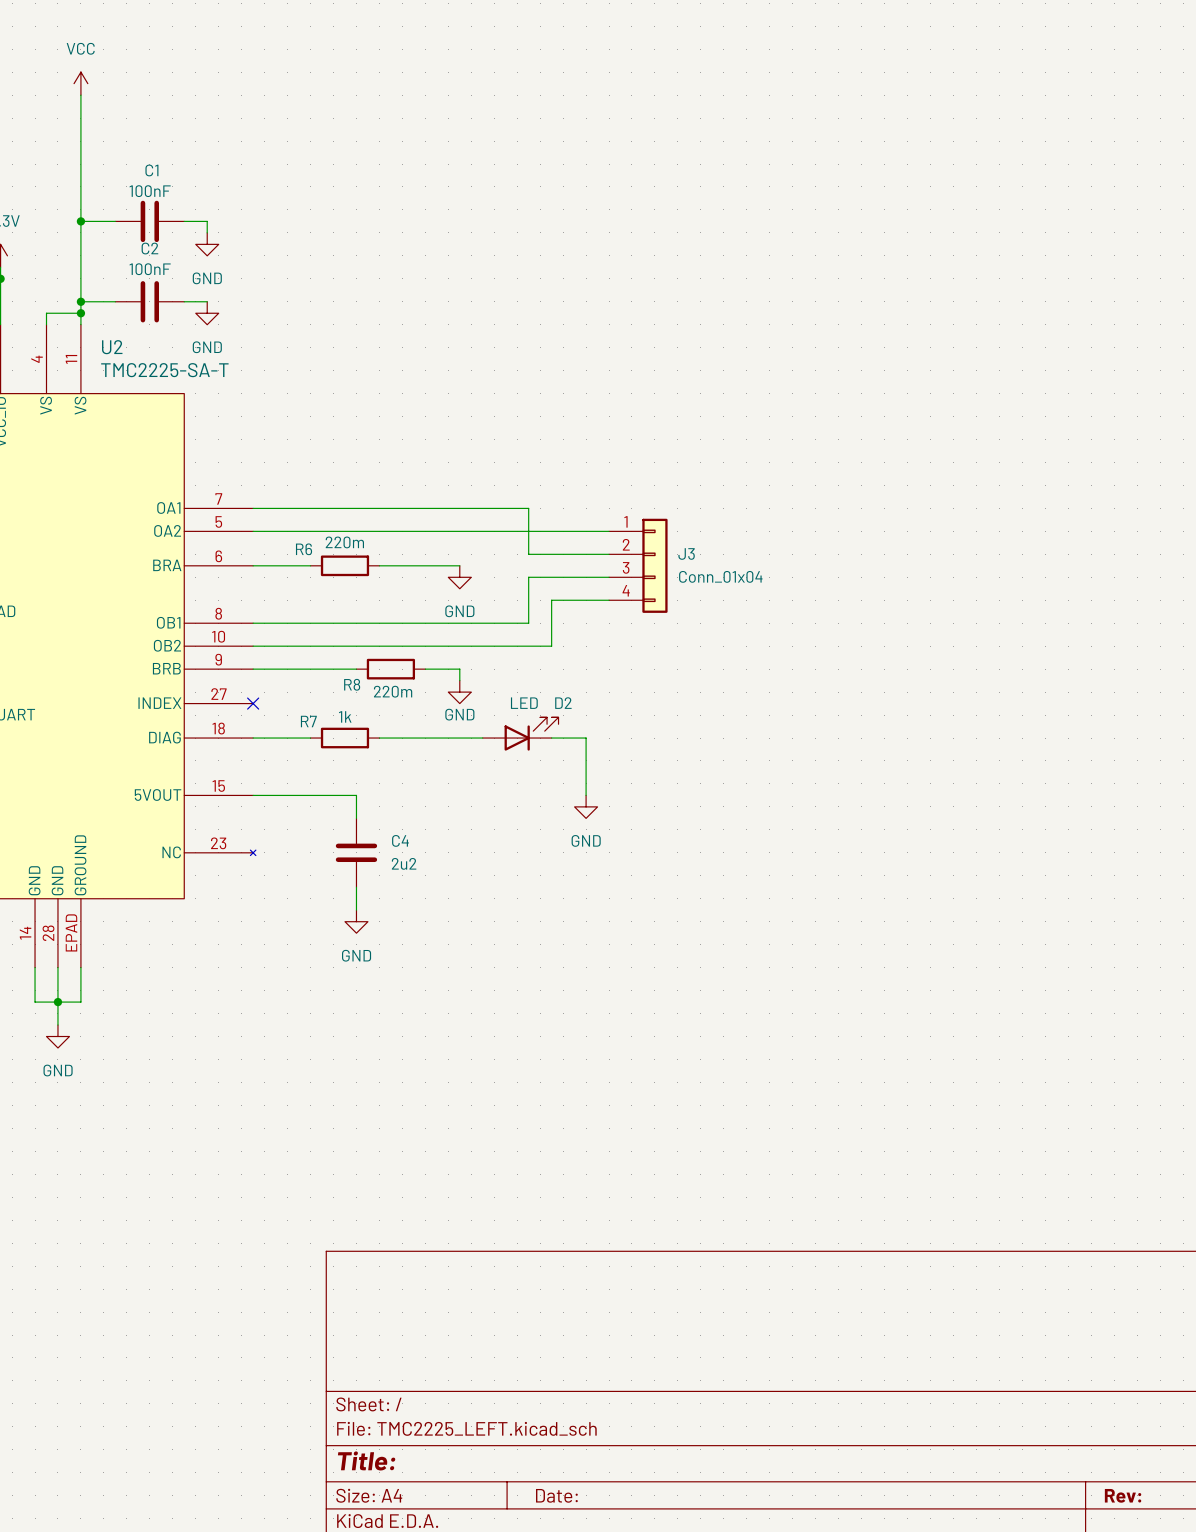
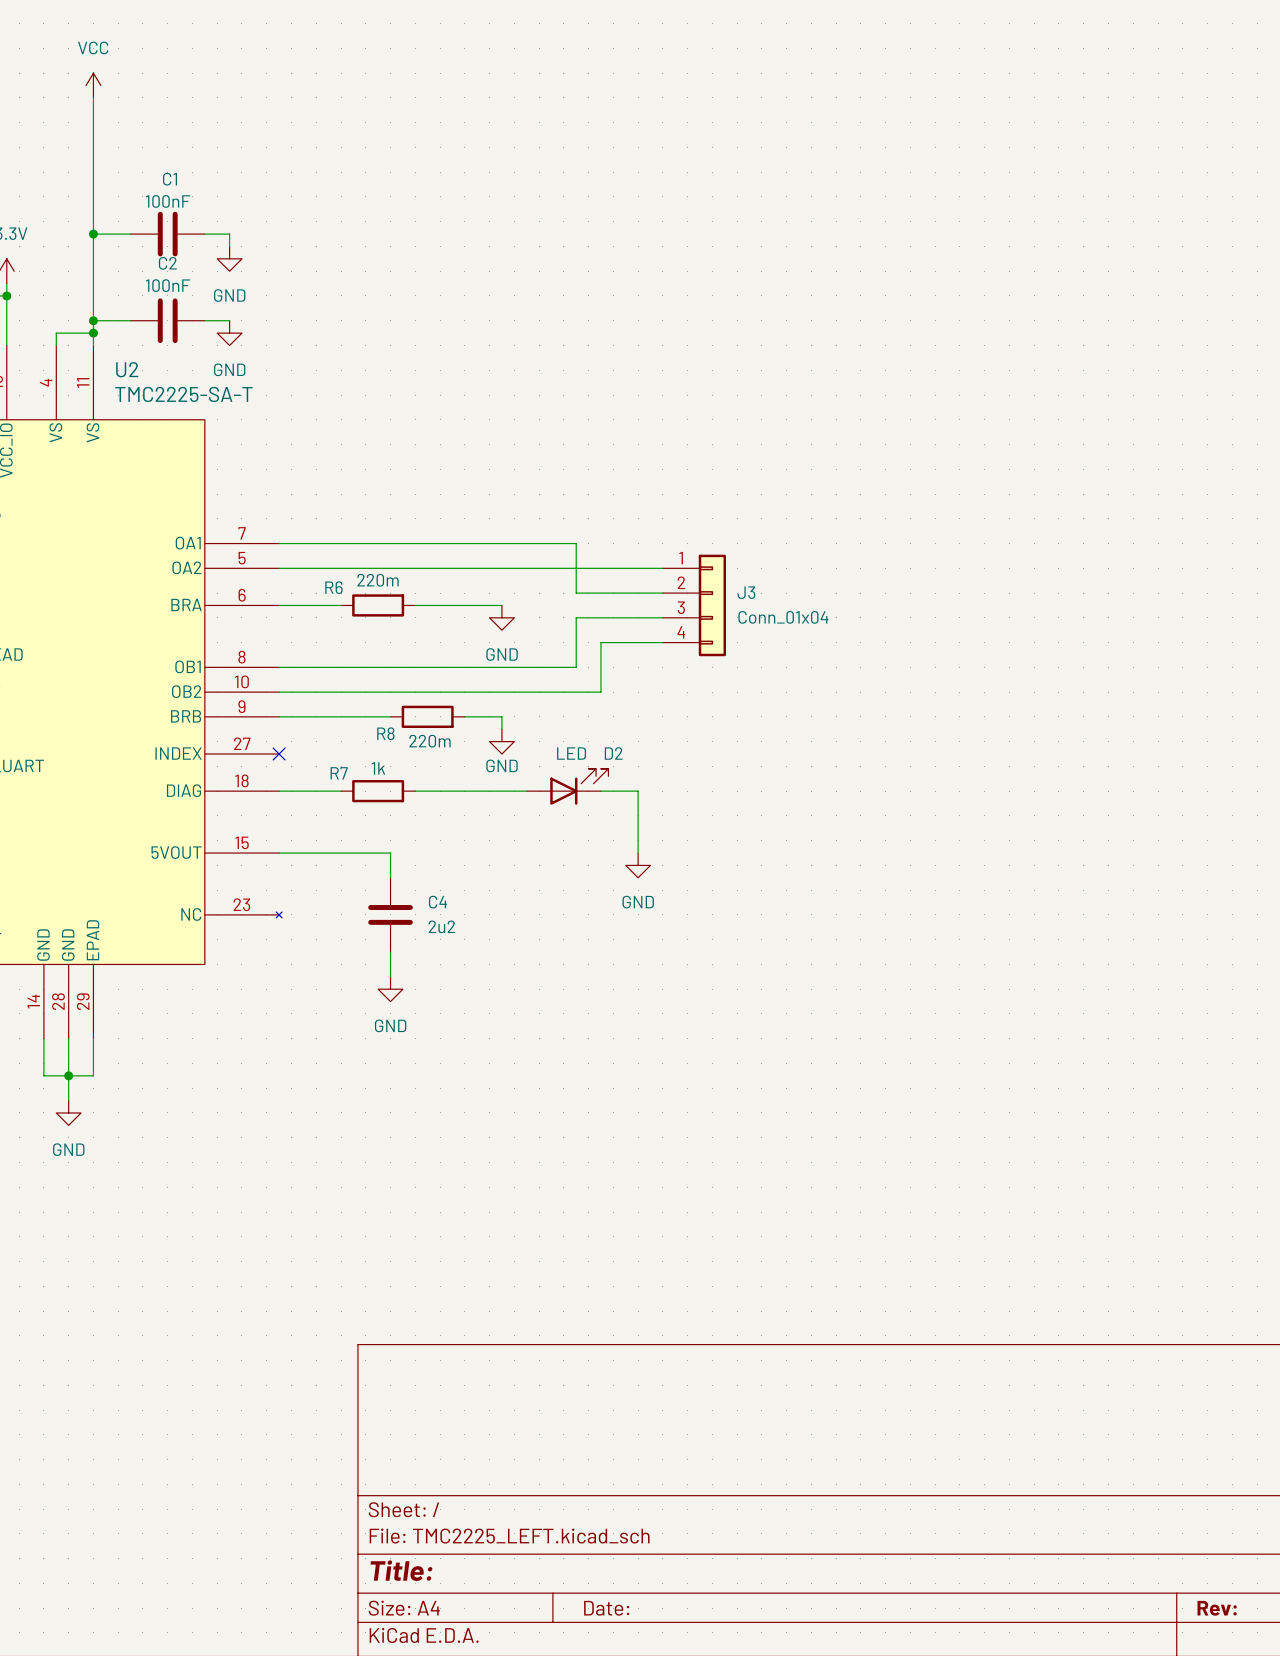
U2 pin name: GROUND (80, 865) -> EPAD (92, 940)
U2 pin number: EPAD (71, 932) -> 29 (83, 1001)

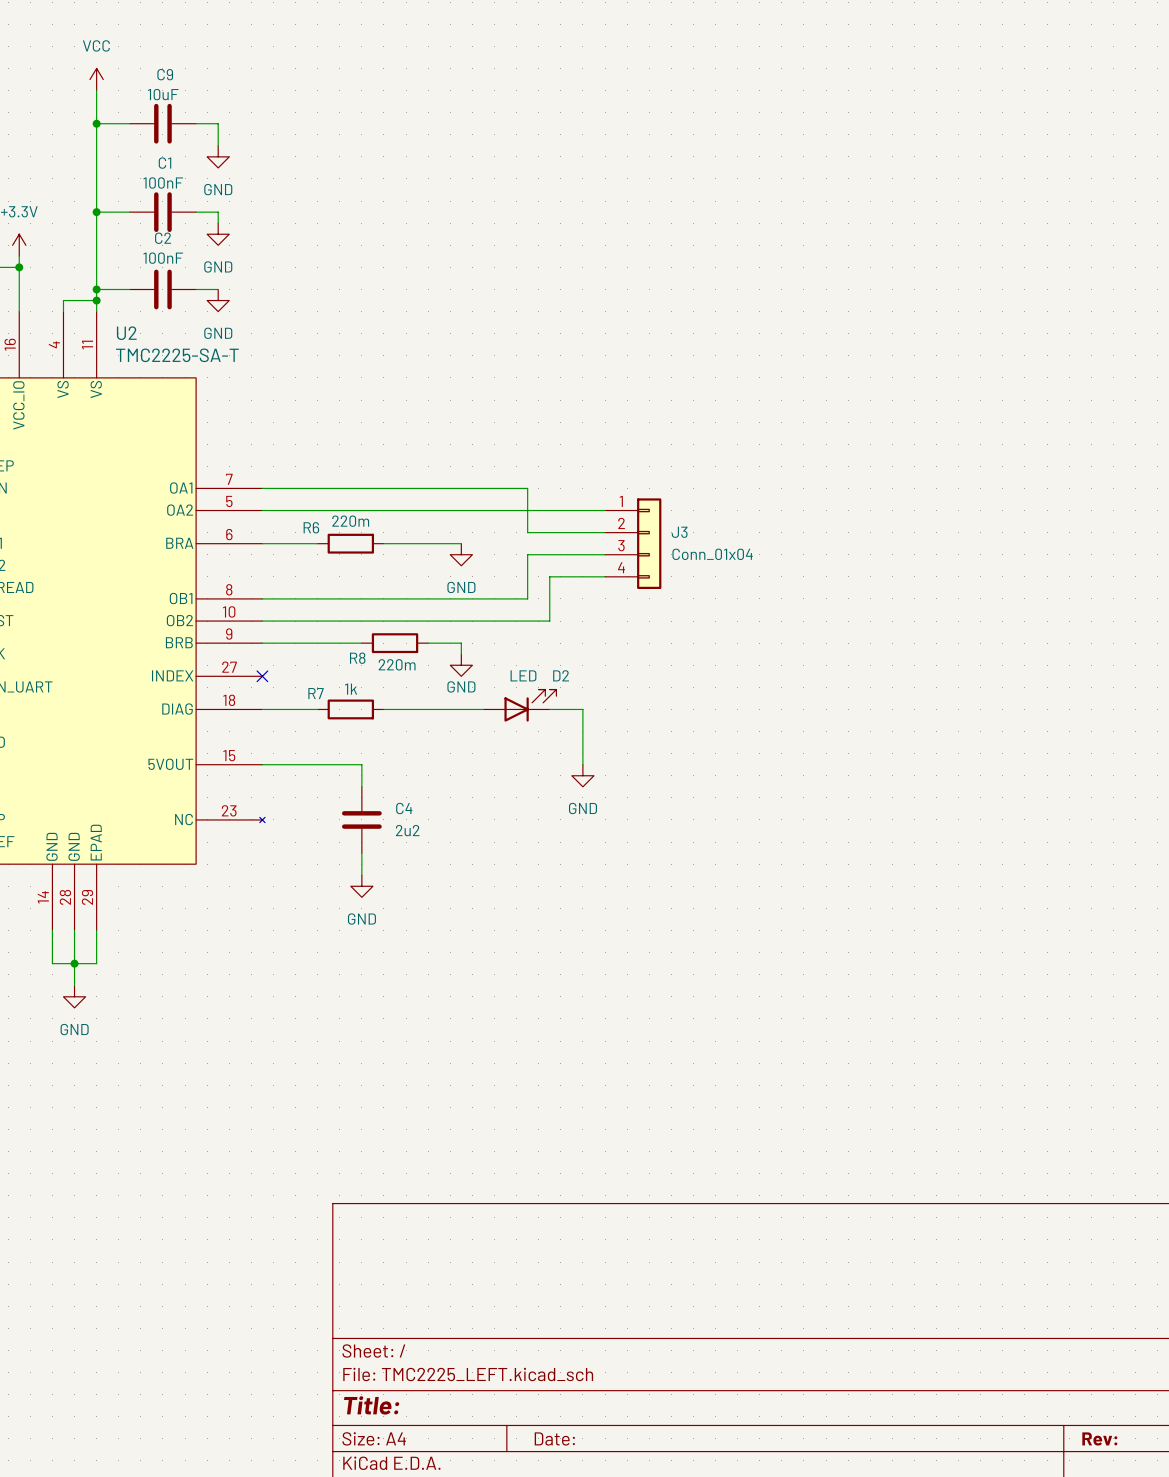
wire: none -> (96, 123) (129, 123)
junction: none -> (96, 123)
C9: none -> 10uF (162, 123)
wire: none -> (196, 123) (218, 123) (218, 145)
power symbol: none -> GND (218, 156)

